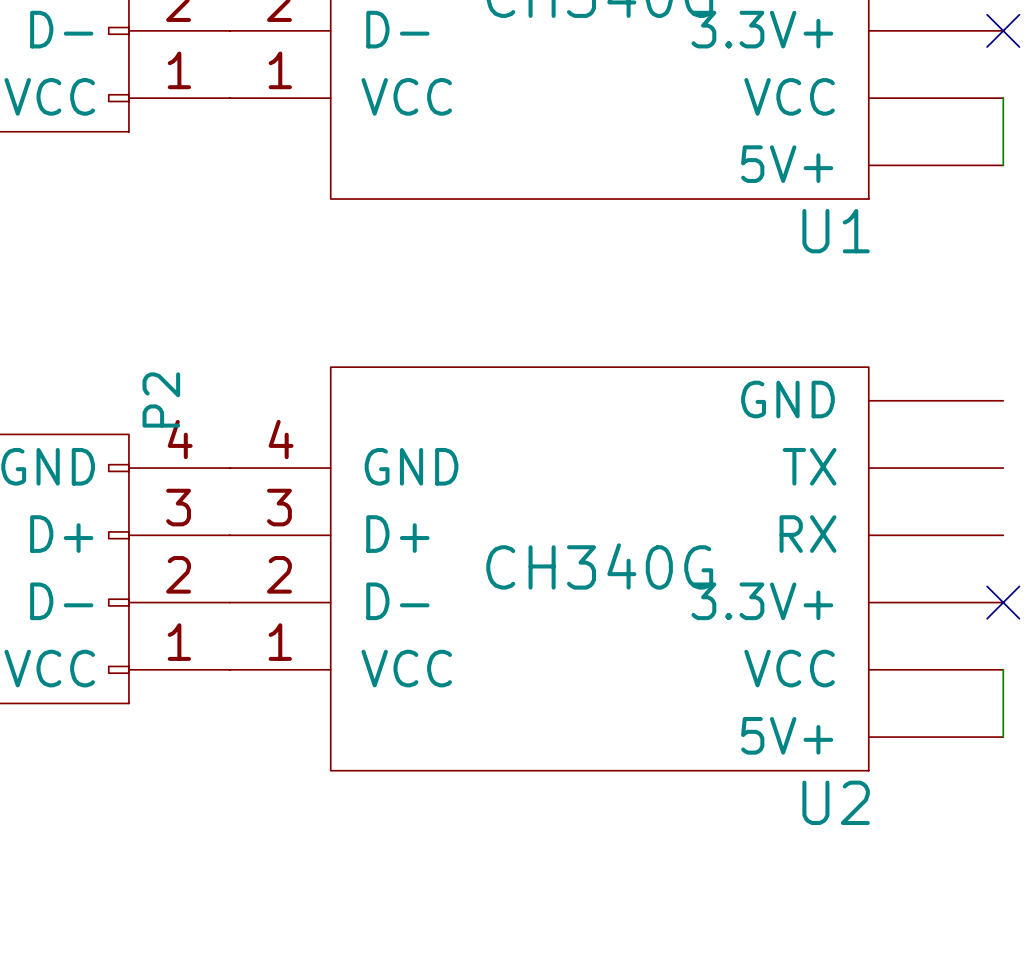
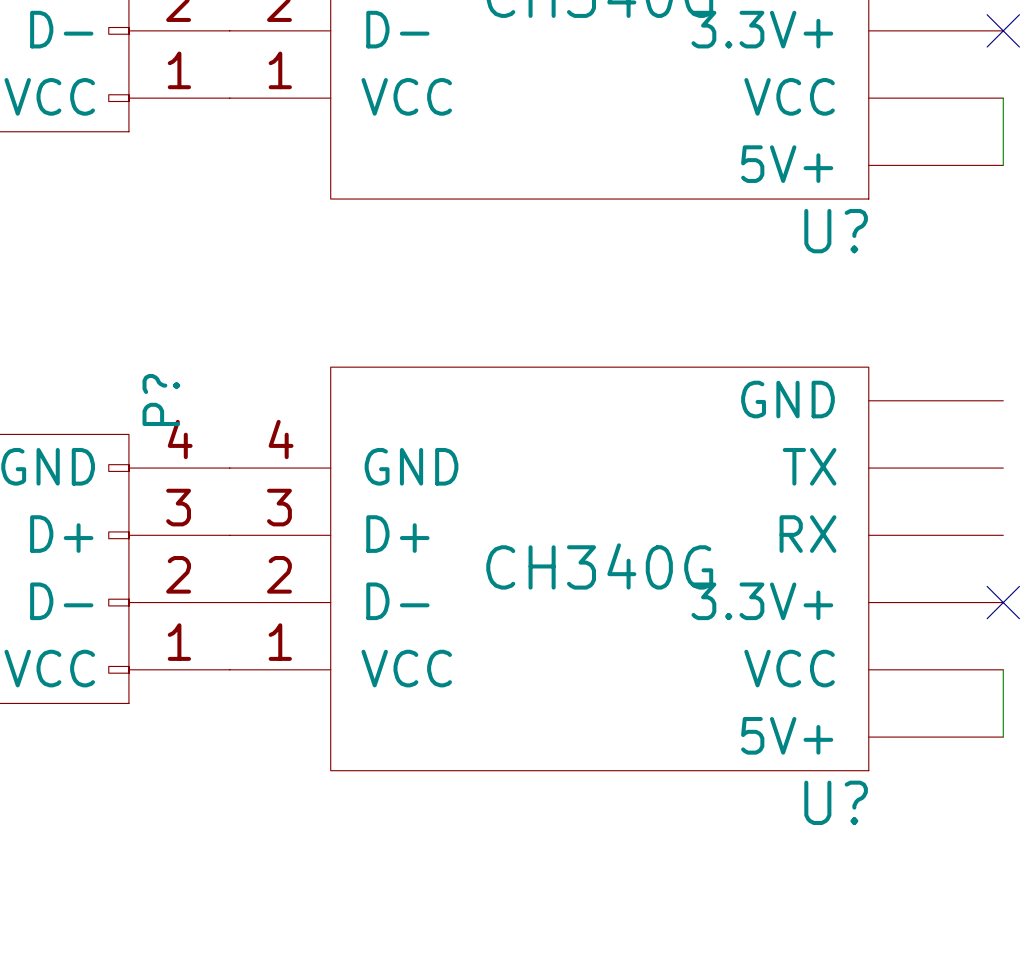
U1 name: U1 (836, 231) -> U? (836, 231)
P2 name: P2 (161, 399) -> P? (161, 399)
U2 name: U2 (836, 802) -> U? (836, 802)

